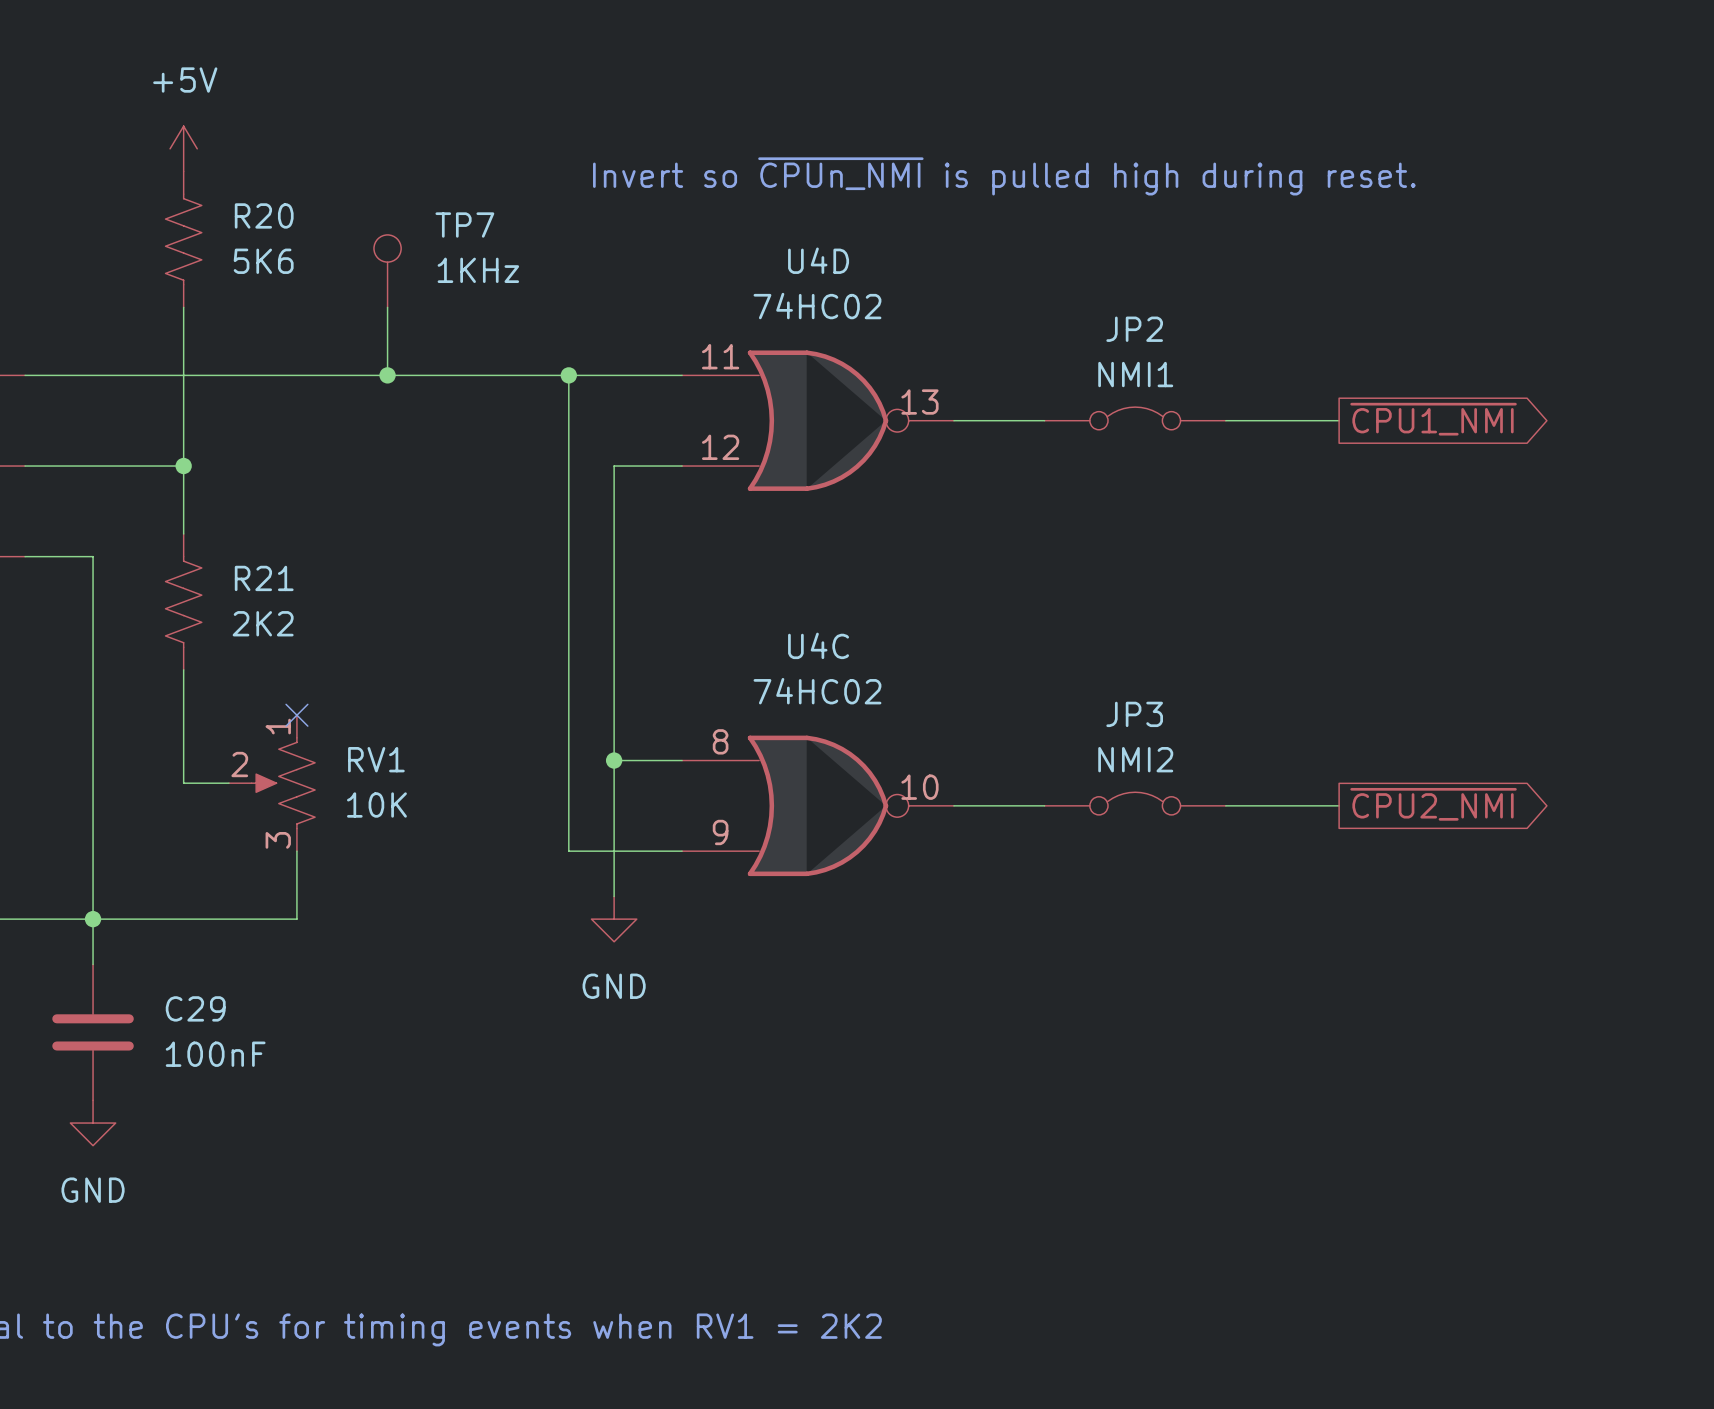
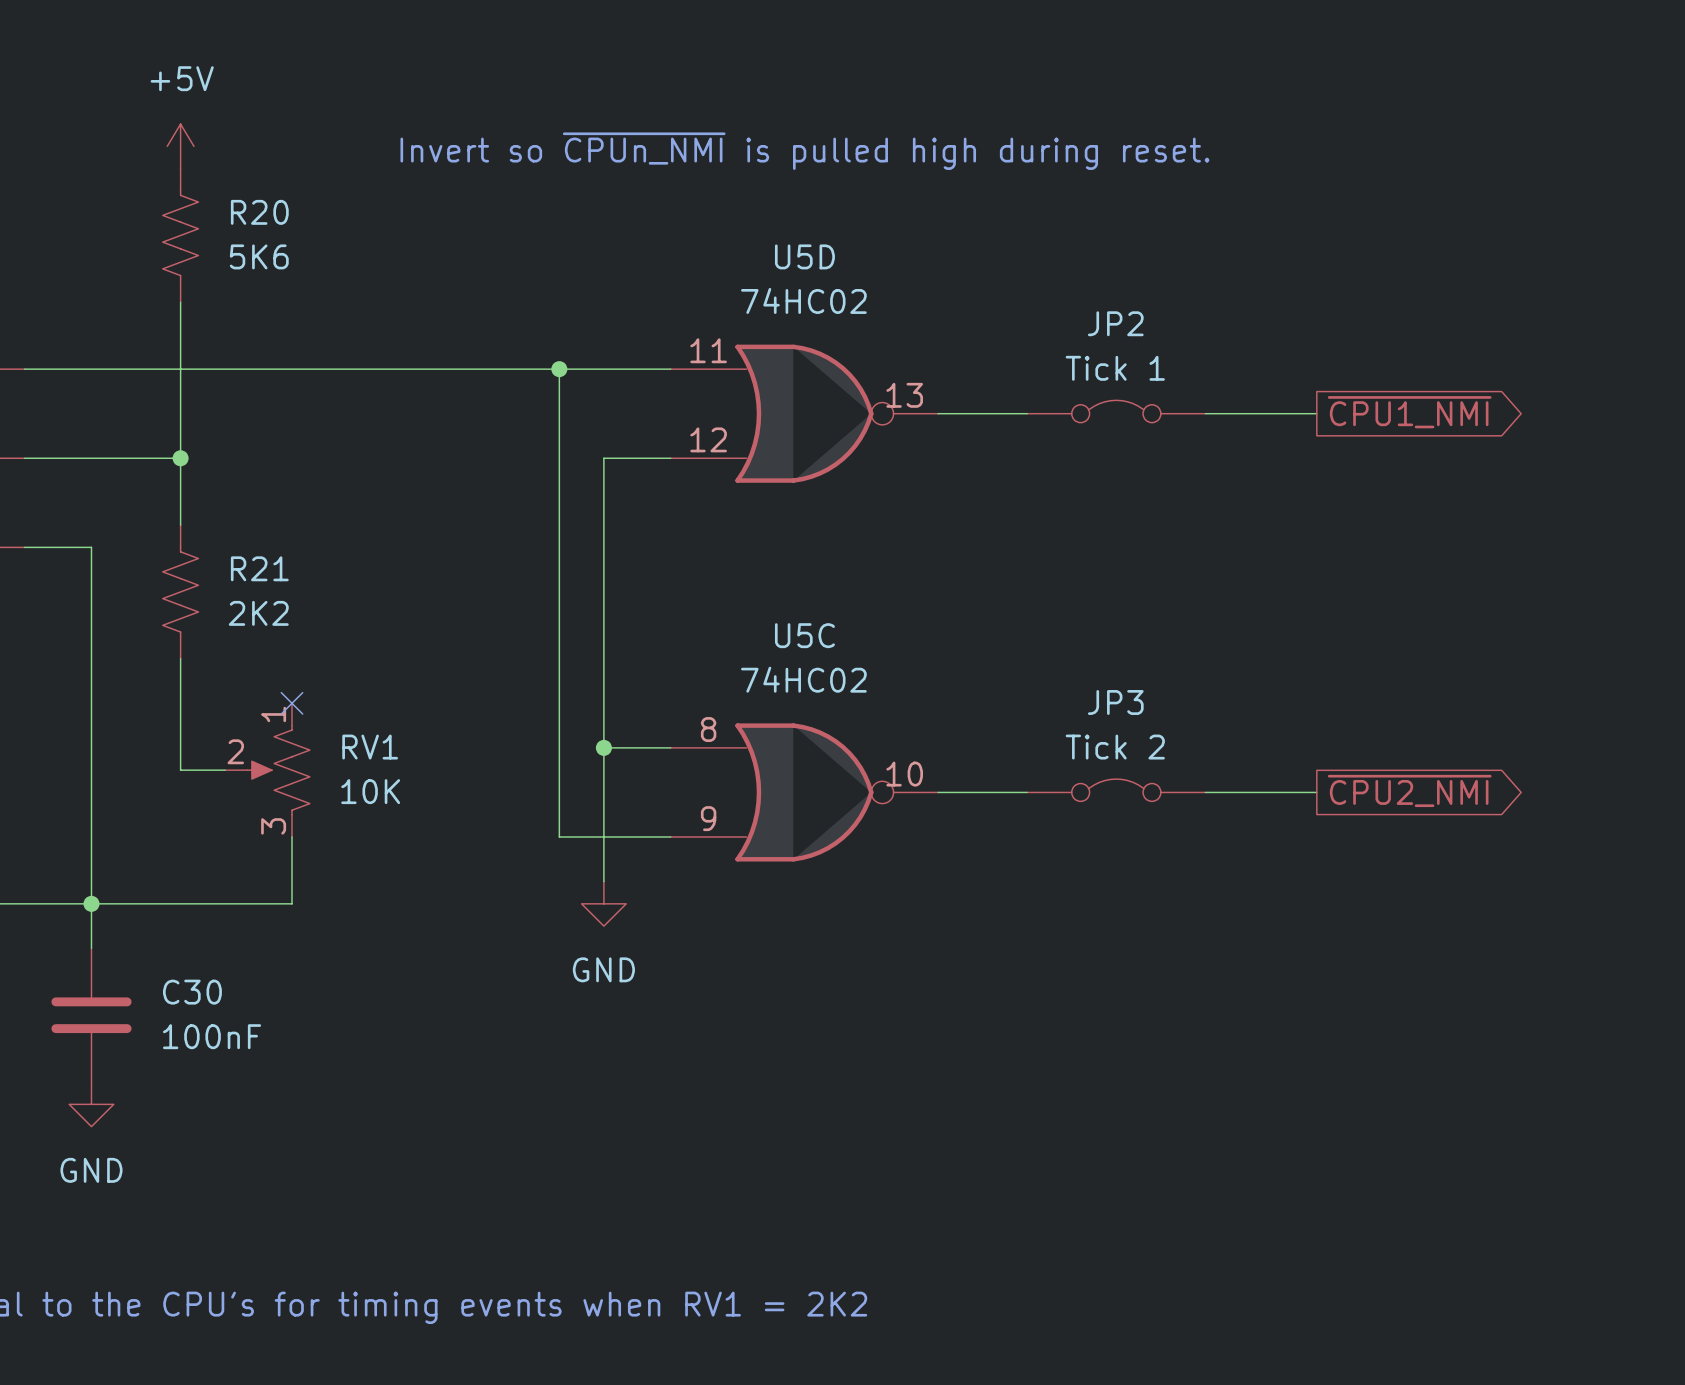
text position: Invert so ~{CPUn_NMI} is pulled high during reset. (1004, 176) -> Invert so ~{CPUn_NMI} is pulled high during reset. (804, 151)
U4D name: U4D (818, 260) -> U5D (804, 256)
TP7: 1KHz (387, 271) -> none
wire: (387, 307) (387, 375) -> none
JP2 value: NMI1 (1135, 374) -> Tick 1 (1115, 368)
junction: (387, 375) -> none
U4C name: U4C (818, 645) -> U5C (804, 635)
JP3 value: NMI2 (1135, 759) -> Tick 2 (1115, 747)
C29 name: C29 (195, 1008) -> C30 (192, 992)

